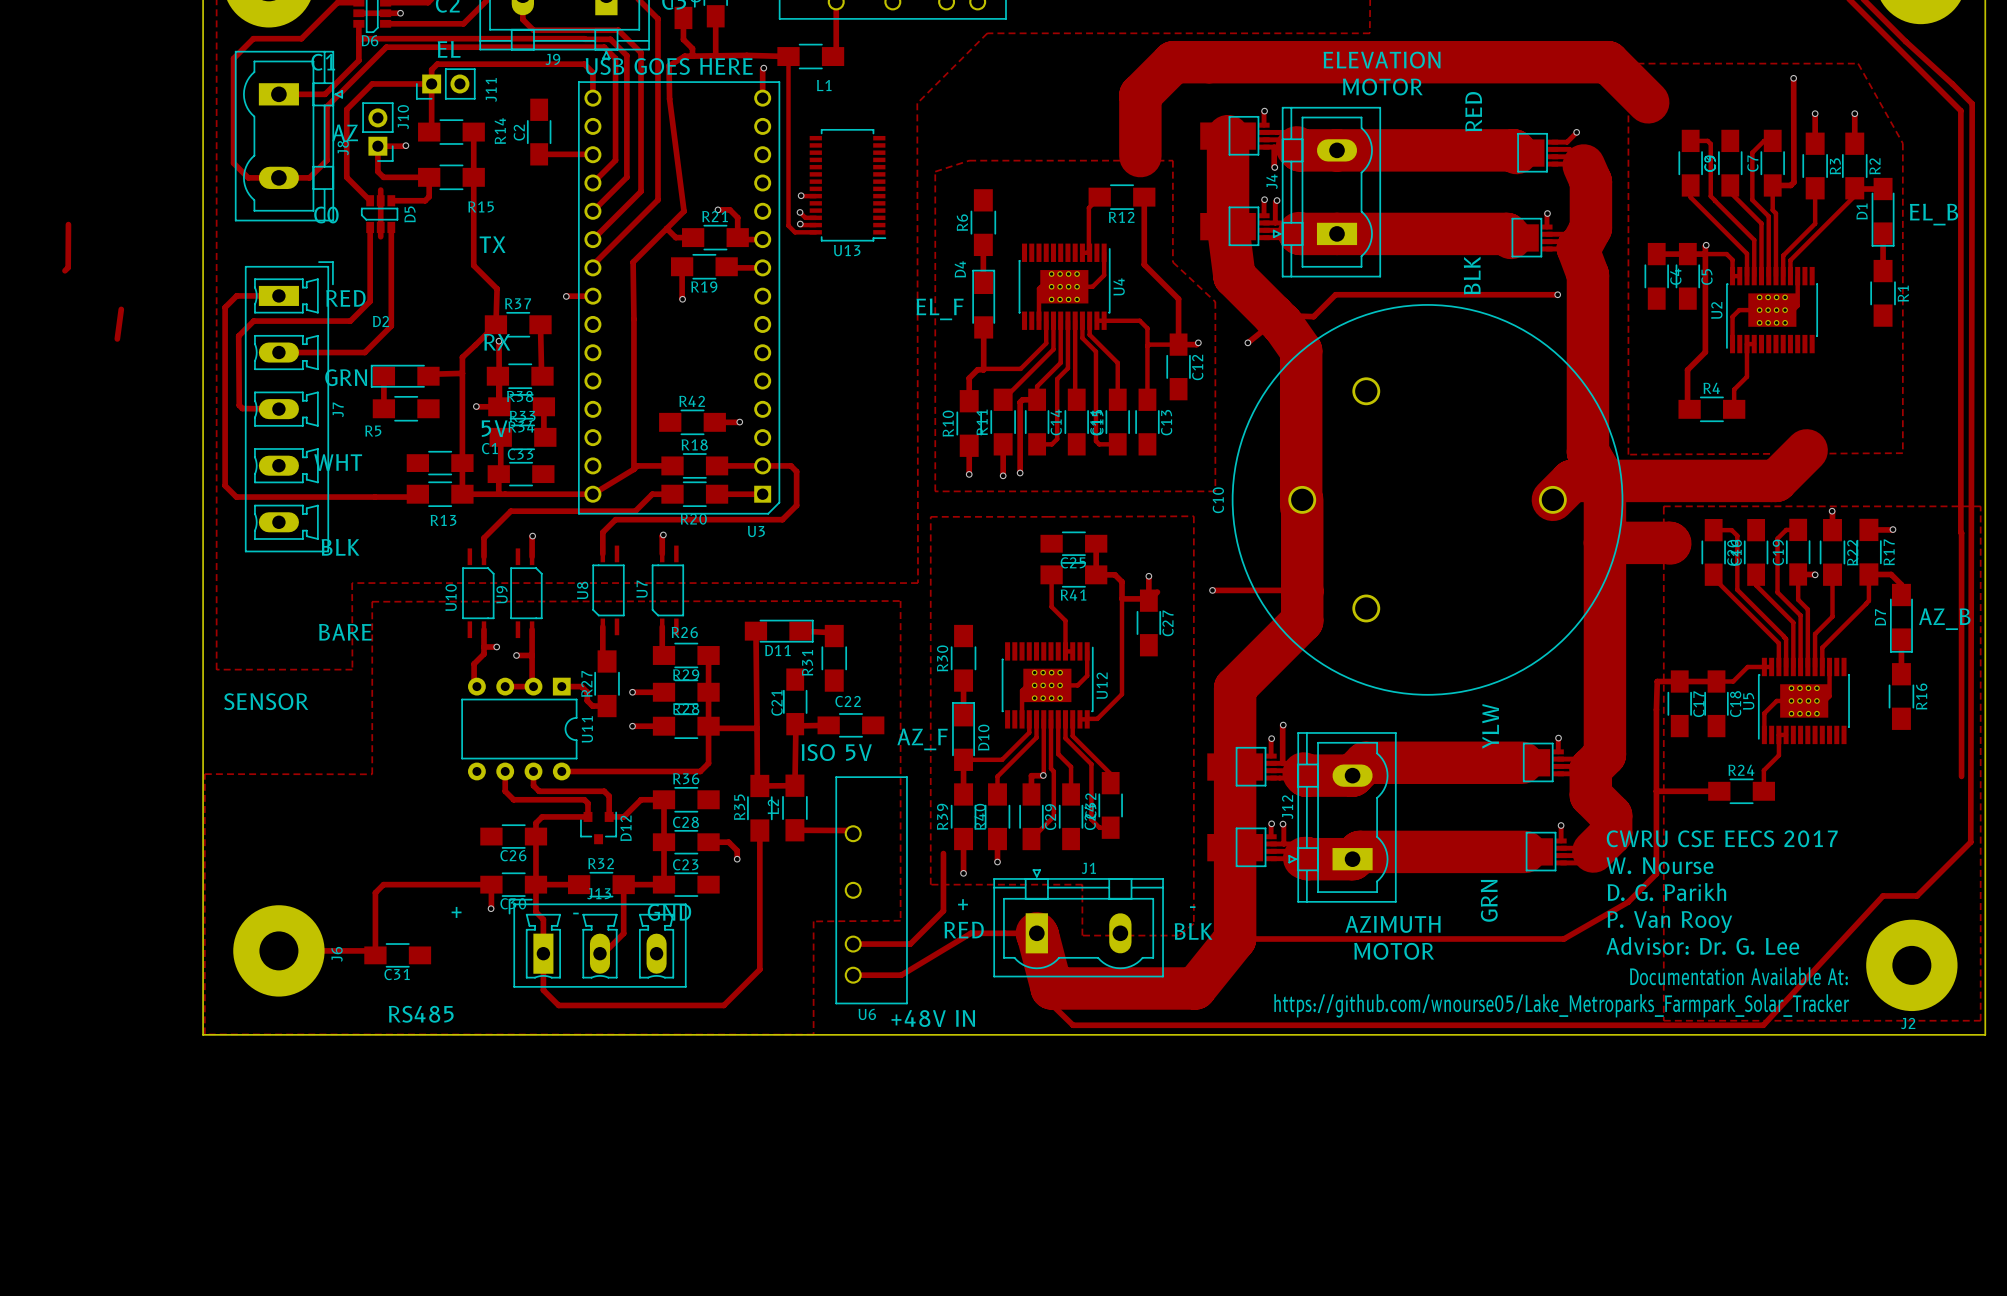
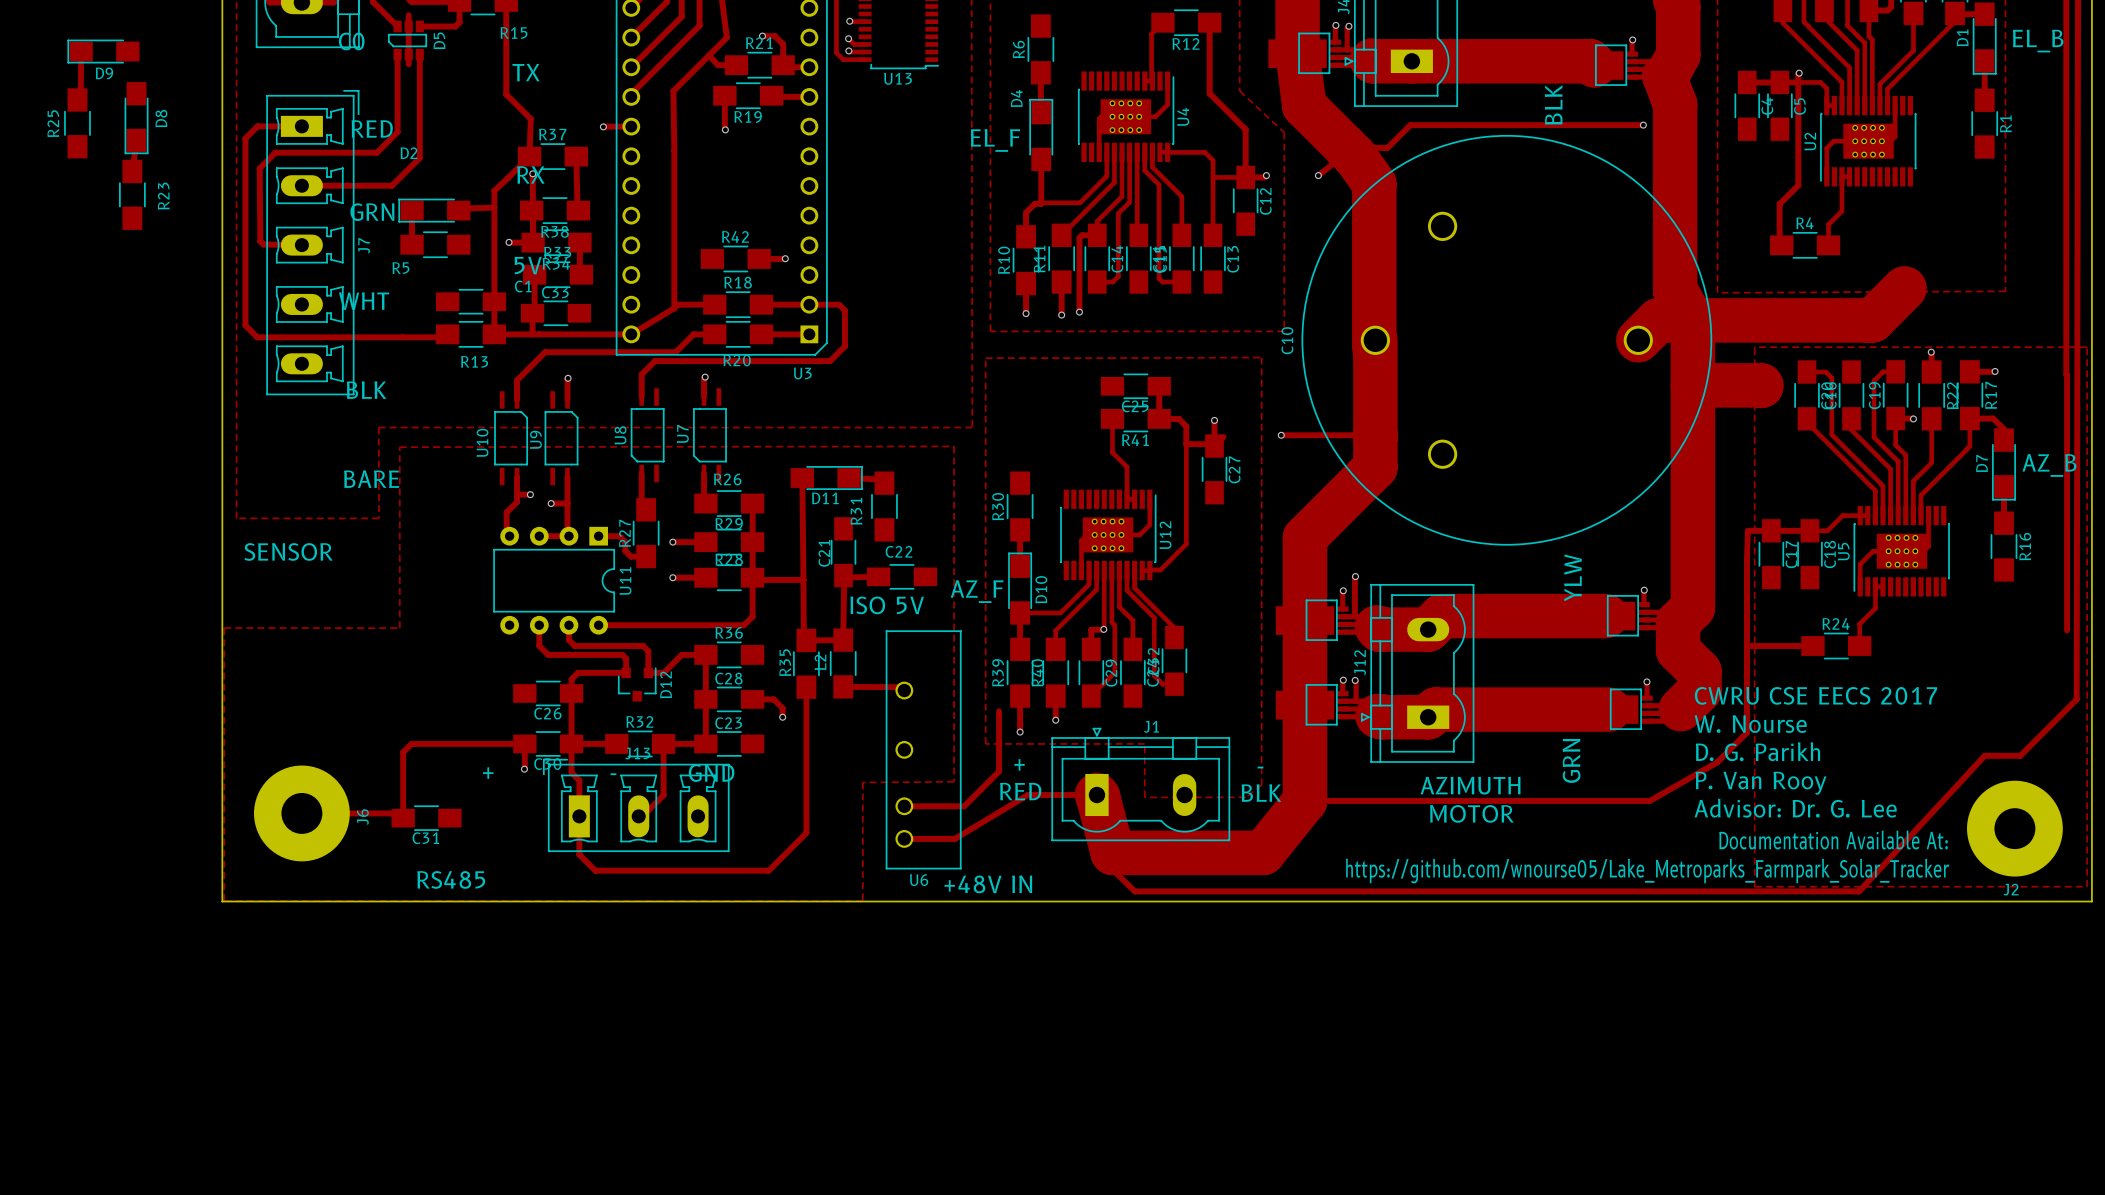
D9: none -> (103, 51)
D8: none -> (136, 118)
R25: none -> (77, 123)
R23: none -> (132, 194)

